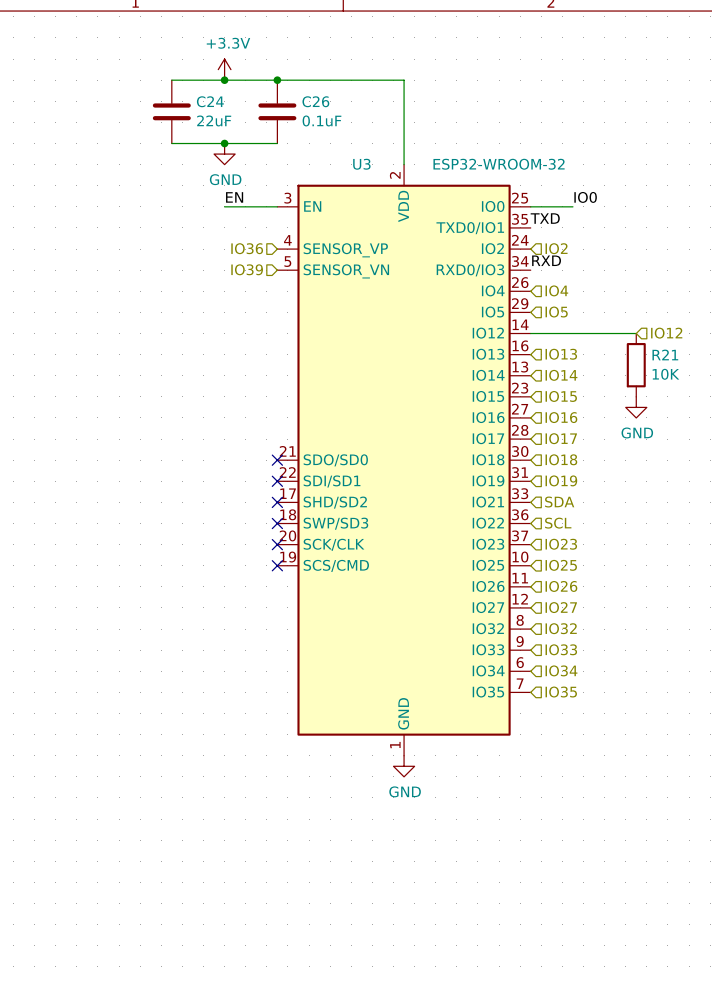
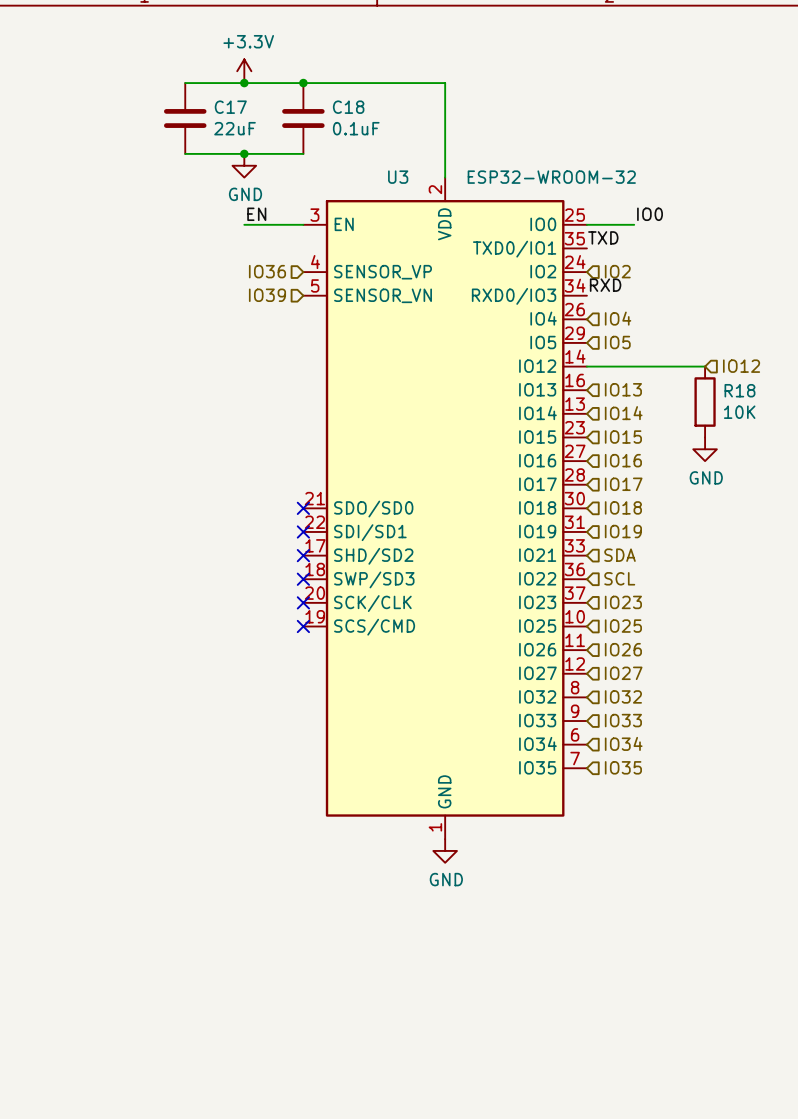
C24 name: C24 (210, 101) -> C17 (230, 107)
C26 name: C26 (315, 101) -> C18 (348, 107)
R21 name: R21 (665, 354) -> R18 (739, 390)

